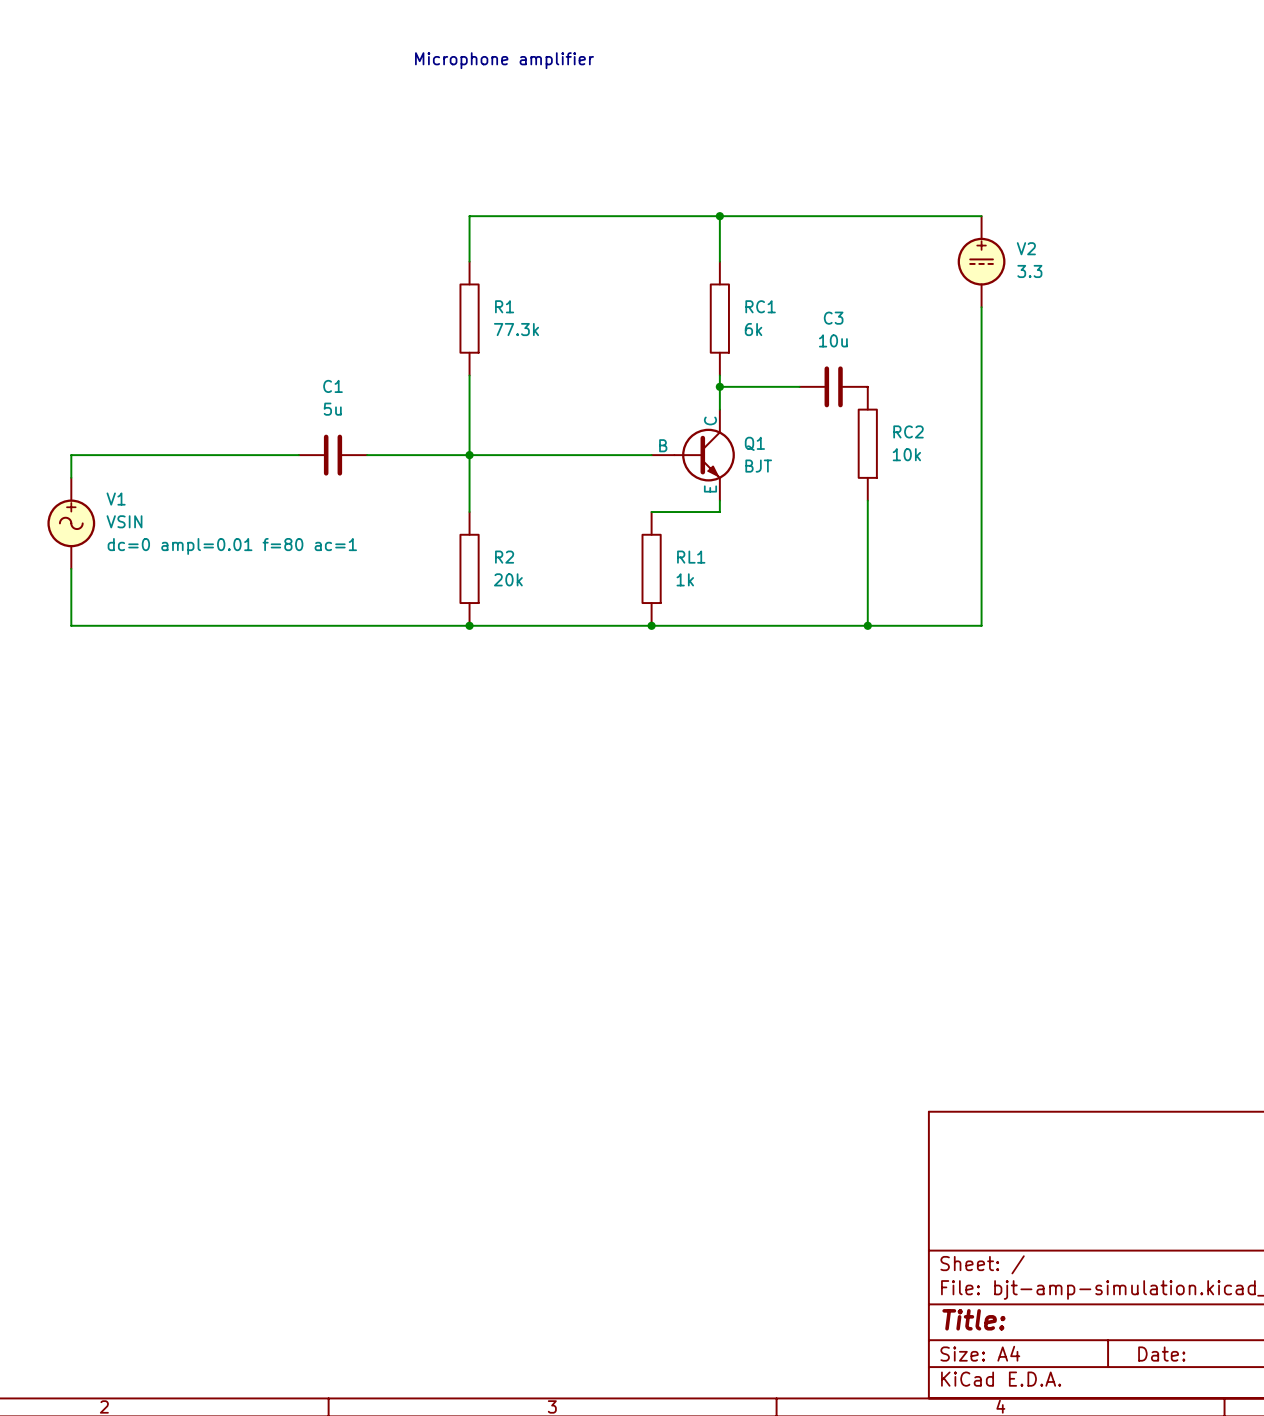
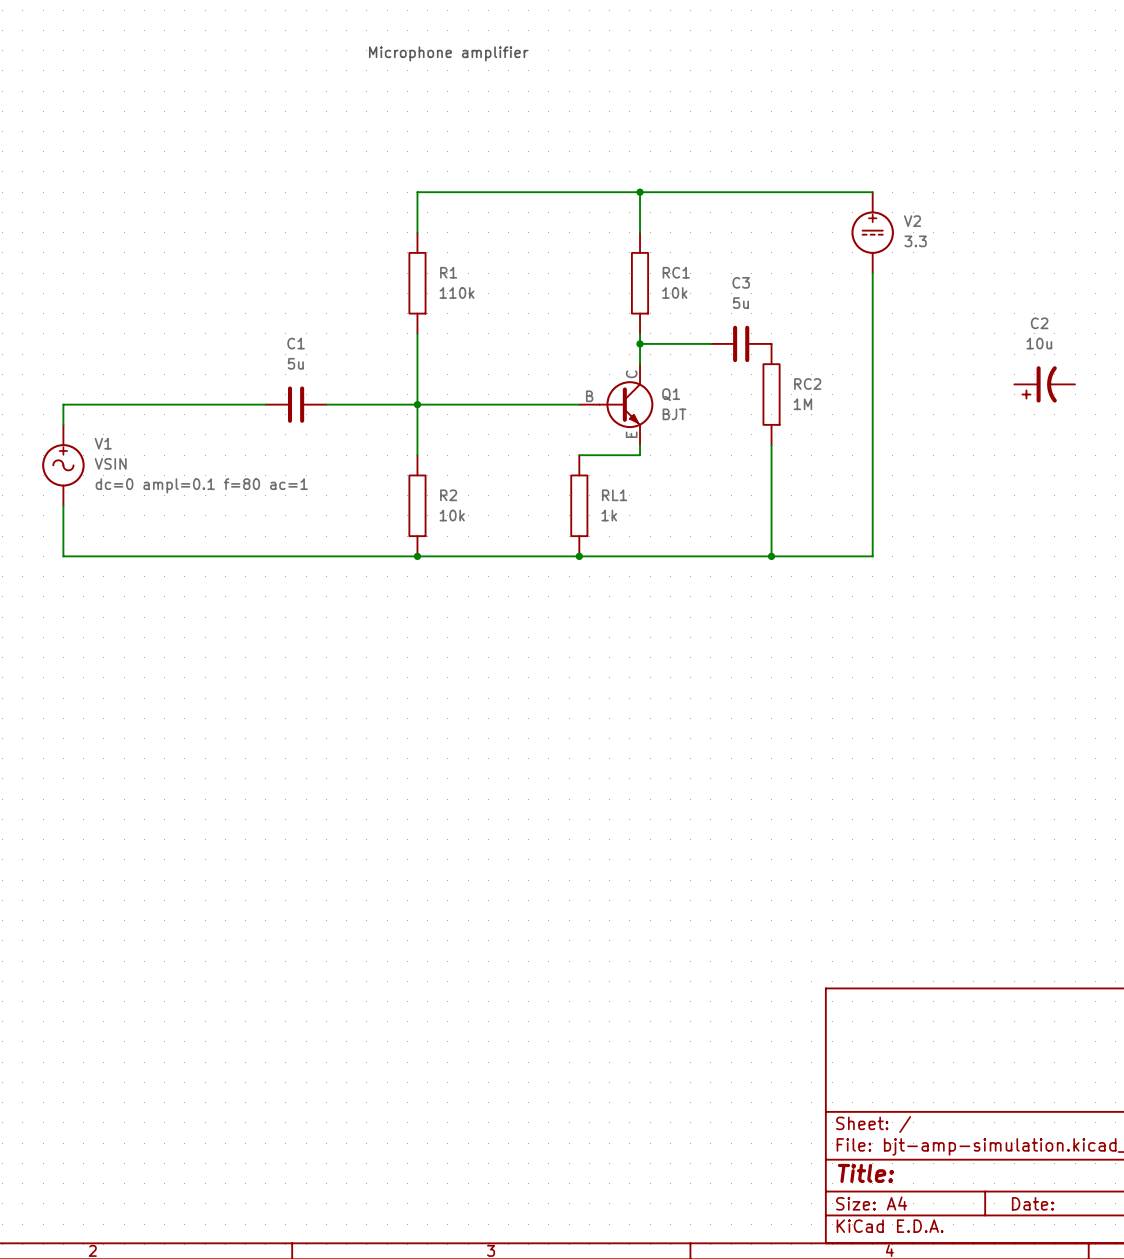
R1 value: 77.3k (516, 329) -> 110k (457, 292)
RC1 value: 6k (753, 329) -> 10k (674, 292)
C3 value: 10u (833, 340) -> 5u (740, 303)
C2: none -> 10u (1044, 384)
RC2 value: 10k (906, 454) -> 1M (802, 404)
V1 text: dc=0 ampl=0.01 f=80 ac=1 (232, 546) -> dc=0 ampl=0.1 f=80 ac=1 (201, 485)
R2 value: 20k (508, 579) -> 10k (452, 515)

